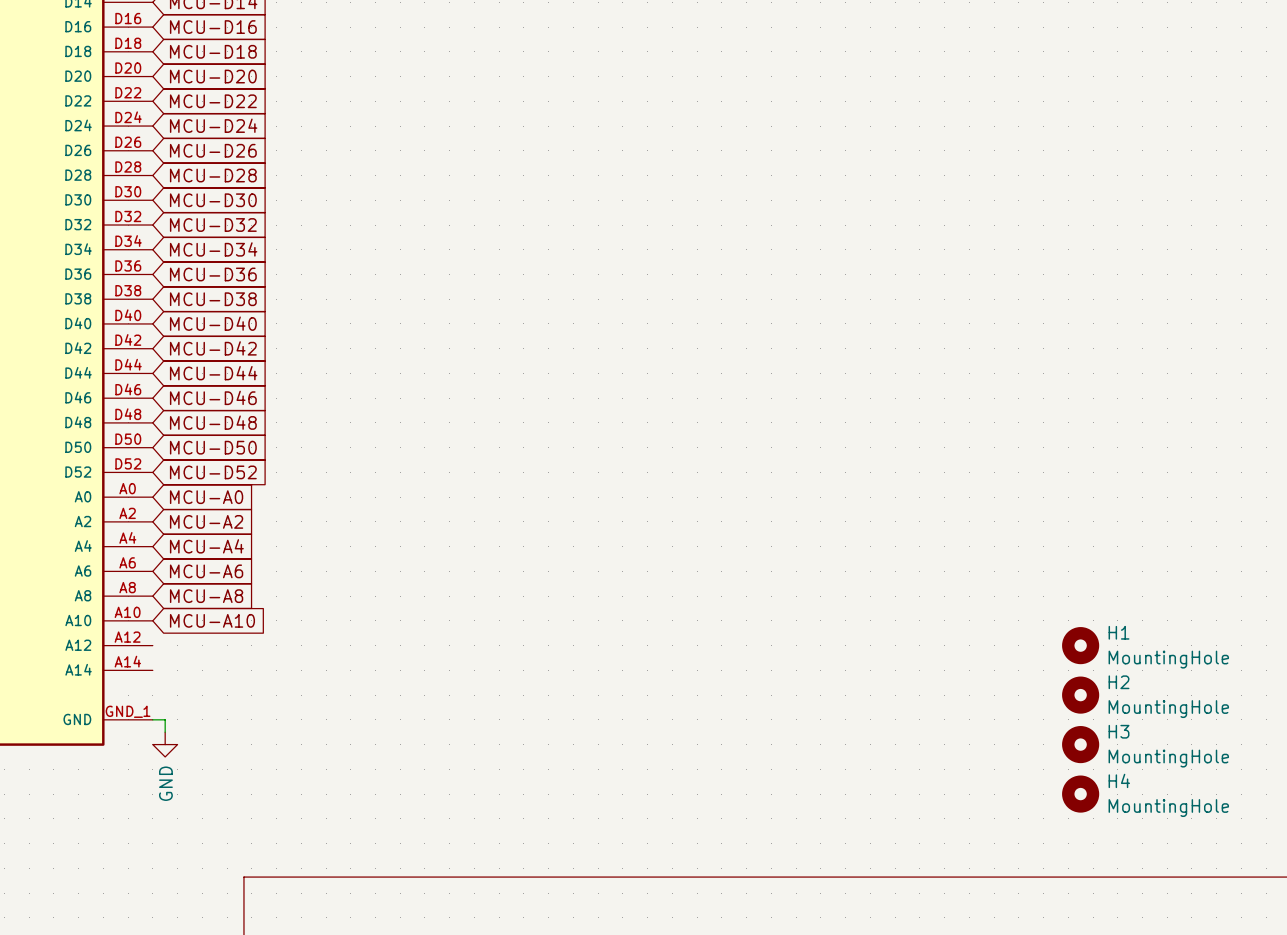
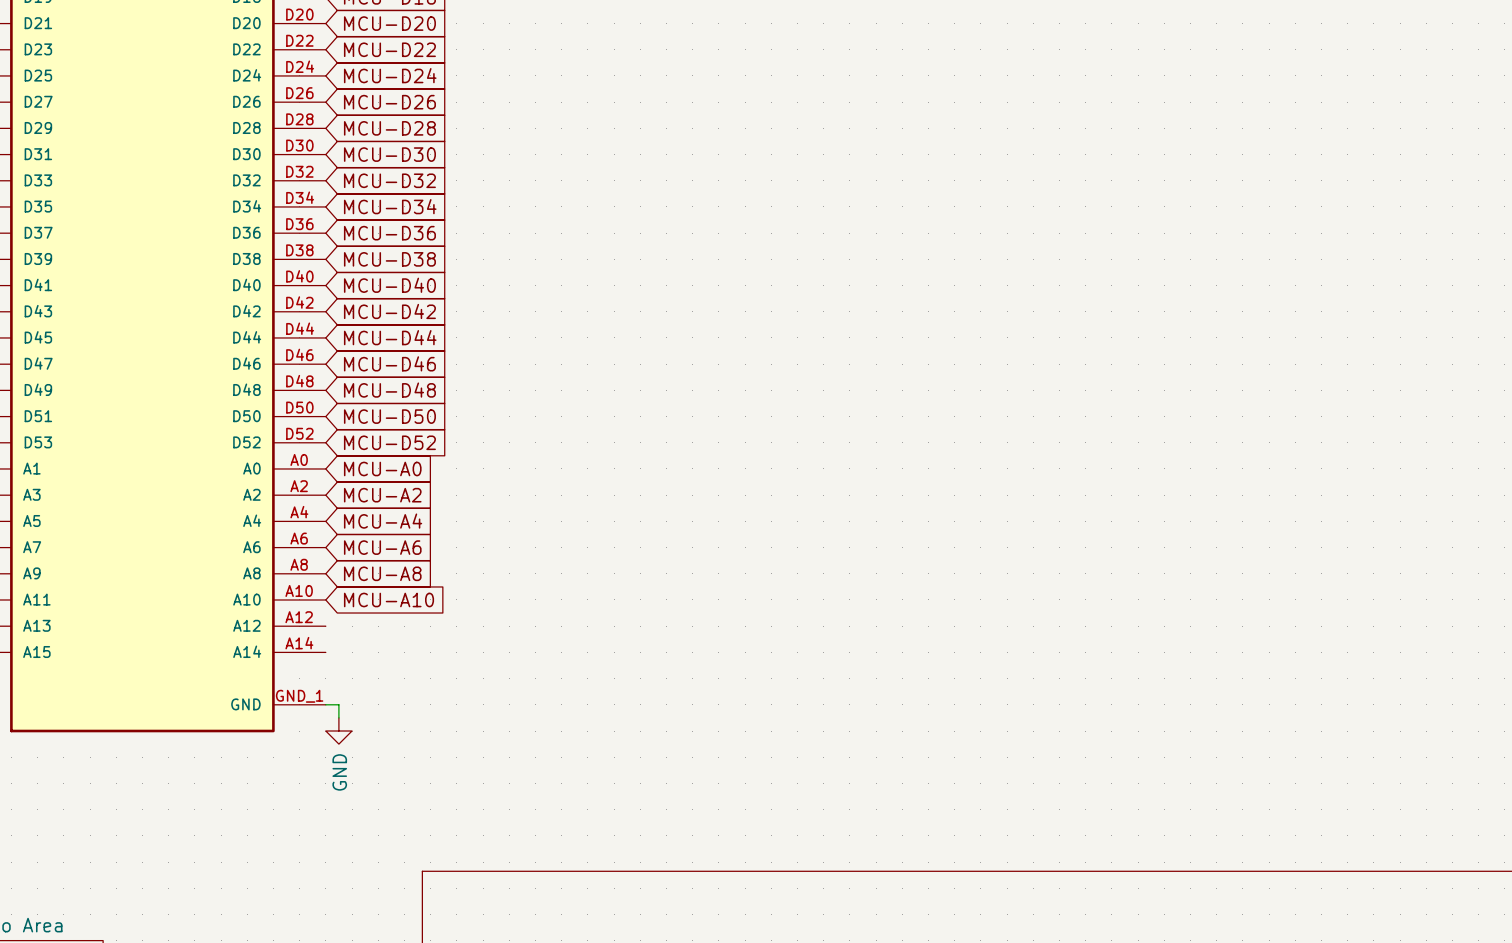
H1: MountingHole (1080, 645) -> none
H2: MountingHole (1080, 695) -> none
H3: MountingHole (1080, 744) -> none
H4: MountingHole (1080, 794) -> none

